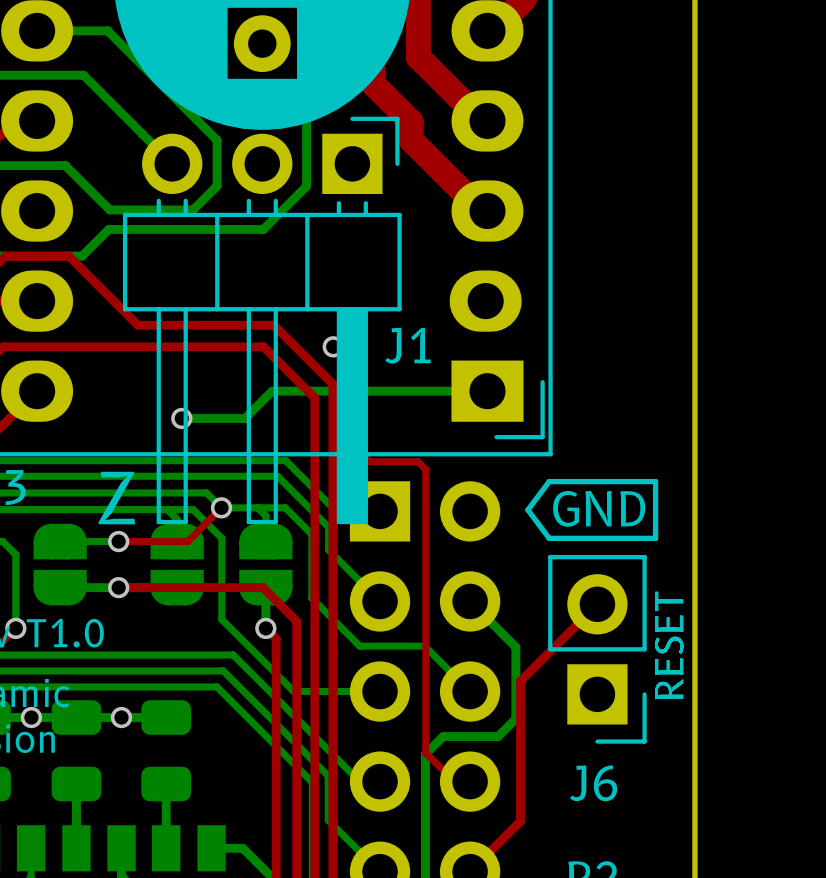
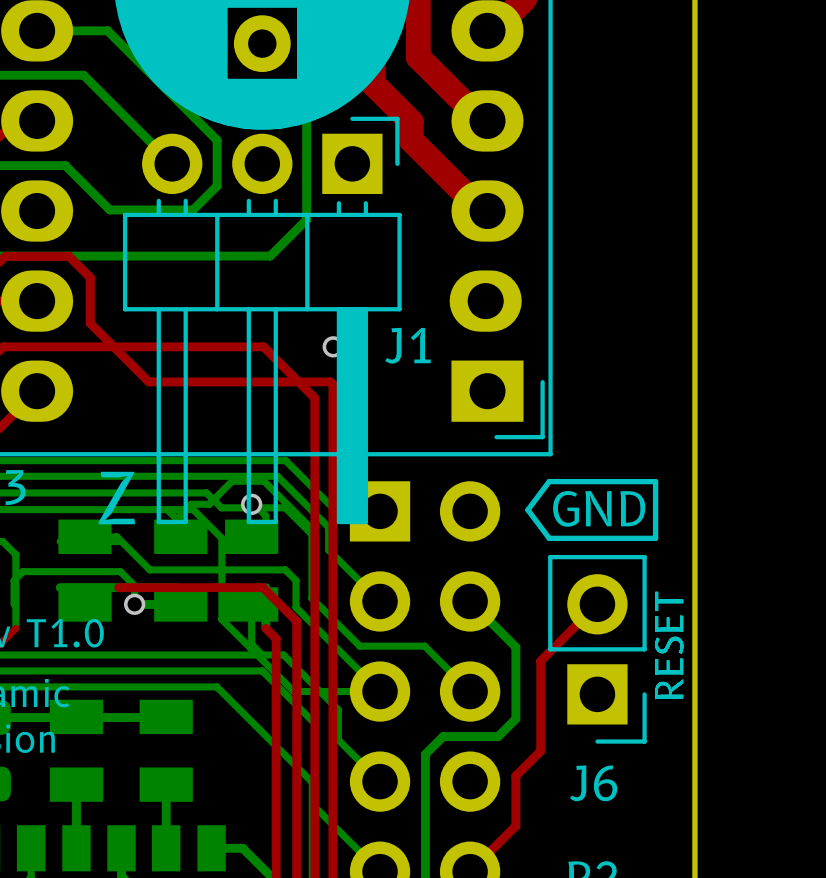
bottom track: (306, 186) (263, 229) (108, 229) (82, 256) -> (306, 186) (306, 219) (270, 256) (82, 256)
top track: (90, 277) (137, 325) (273, 325) (330, 381) -> (90, 277) (90, 323) (148, 381) (330, 381)
top track: (333, 346) (349, 363) (349, 441) (370, 461) (417, 461) (425, 469) (425, 752) (454, 781) (470, 781) -> none
bottom track: (487, 391) (272, 391) (244, 418) (181, 418) -> none
via: (181, 418) -> none
top track: (221, 507) (187, 541) (118, 541) -> none
via position: (221, 507) -> (251, 504)
part footprint: [33, 523, 87, 606] -> [58, 519, 112, 622]
part footprint: [150, 523, 204, 606] -> [154, 519, 208, 622]
part footprint: [239, 523, 293, 606] -> [225, 519, 279, 622]
bottom track: none -> (85, 536) (116, 536) (149, 569) (285, 569) (295, 580) (295, 607) (380, 691)
bottom track: none -> (180, 536) (180, 514) (191, 504) (209, 504) (232, 481) (264, 481) (315, 532) (315, 601)
via: (118, 541) -> none
via position: (118, 587) -> (134, 604)
bottom track: none -> (14, 604) (14, 580) (22, 571) (120, 571) (134, 585) (134, 604) (180, 604)
bottom track: none -> (251, 604) (251, 644) (262, 655)
via: (15, 628) -> none
via: (265, 628) -> none
bottom track: (233, 655) (359, 781) (380, 781) -> (233, 655) (283, 655) (338, 709) (338, 739) (380, 781)
top track: (540, 661) (520, 681) (520, 821) (515, 825) -> (540, 661) (540, 751) (515, 775) (515, 825)
bottom track: (223, 670) (328, 775) (328, 820) -> (223, 670) (262, 670) (315, 724) (315, 807) (328, 820)
part footprint: [51, 700, 102, 802] -> [49, 699, 104, 802]
part footprint: [141, 700, 192, 802] -> [139, 699, 193, 802]
via: (31, 717) -> none
via: (121, 717) -> none

